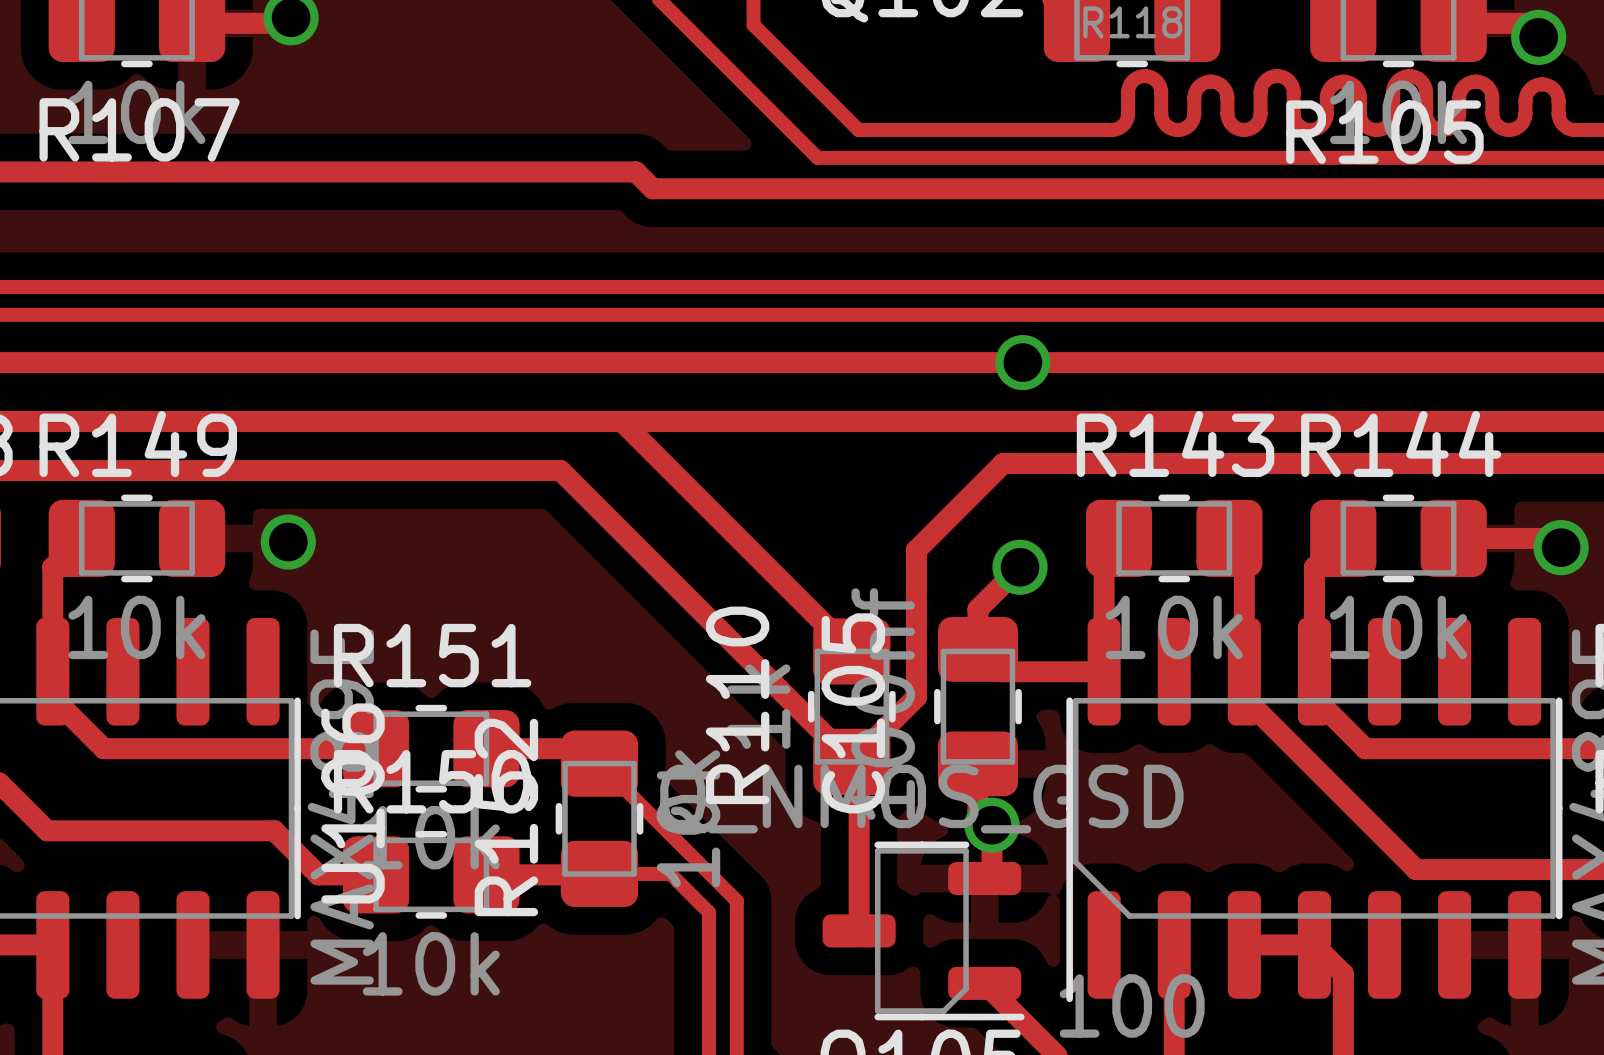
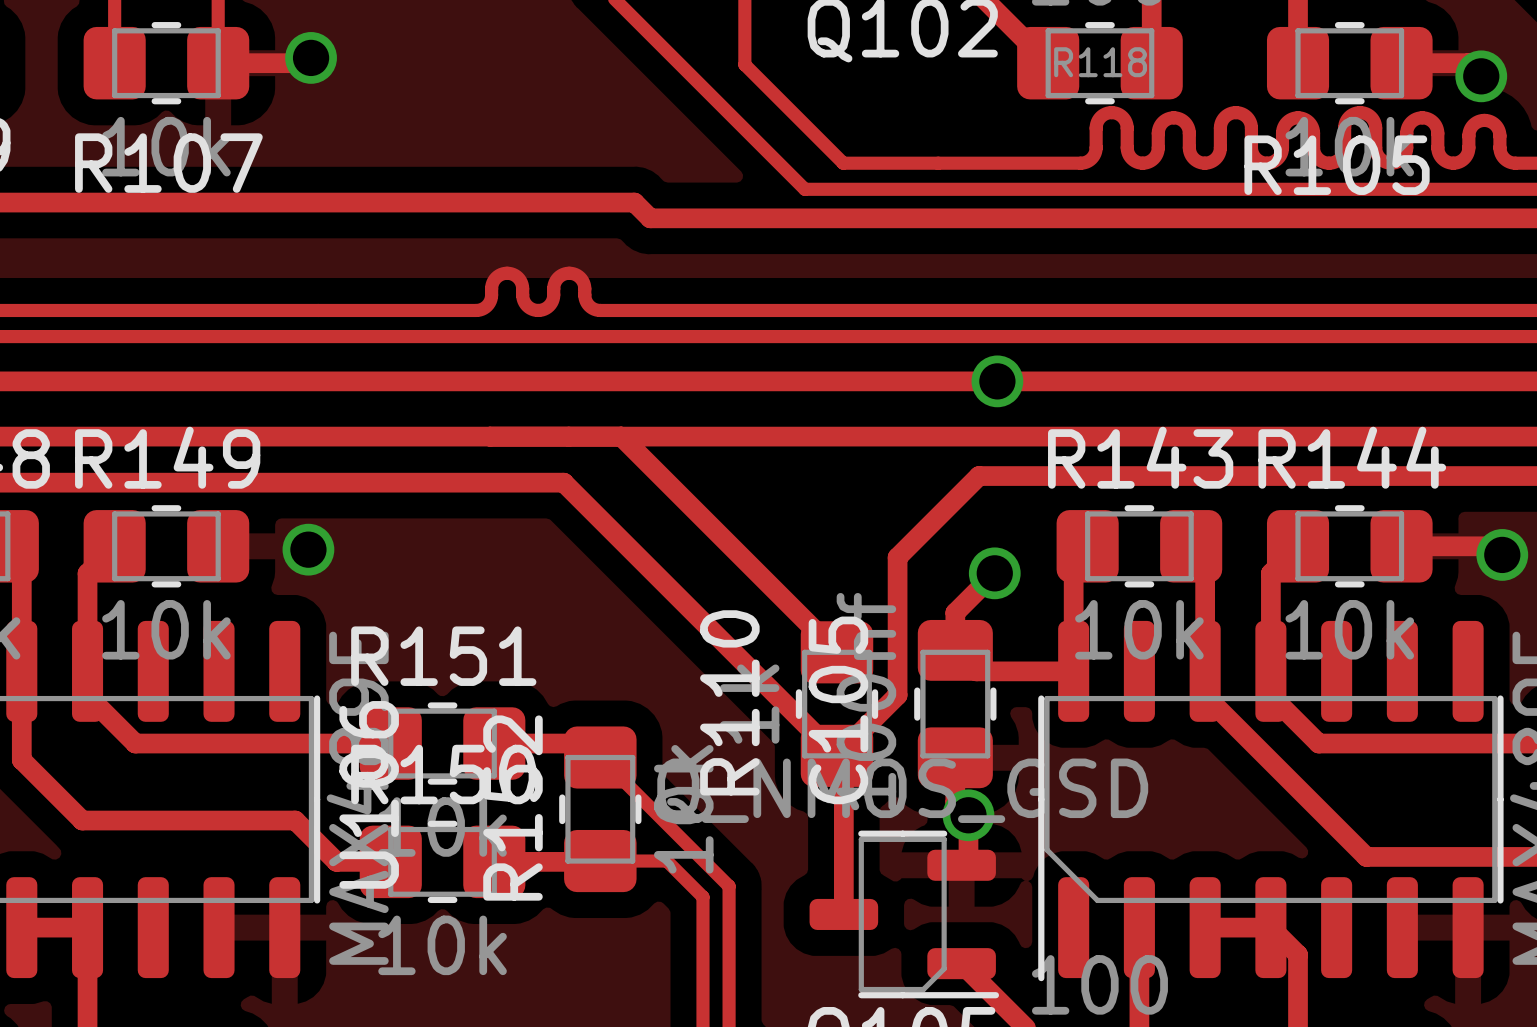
track: (467, 287) (599, 287) -> (476, 310) (483, 308) (489, 302) (494, 279) (501, 274) (507, 273) (514, 275) (519, 279) (522, 284) (523, 300) (532, 309) (540, 310) (549, 305) (553, 298) (555, 281) (561, 275) (569, 273) (575, 274) (581, 279) (586, 302) (592, 308) (600, 310)

